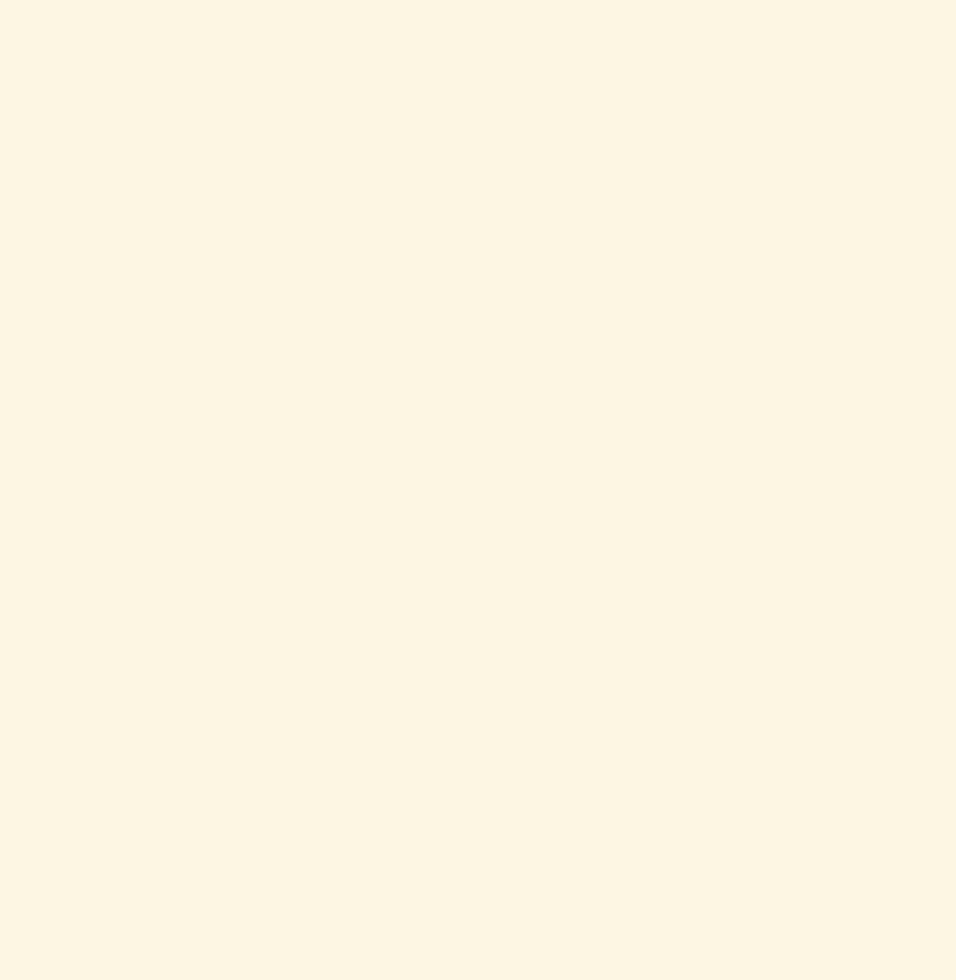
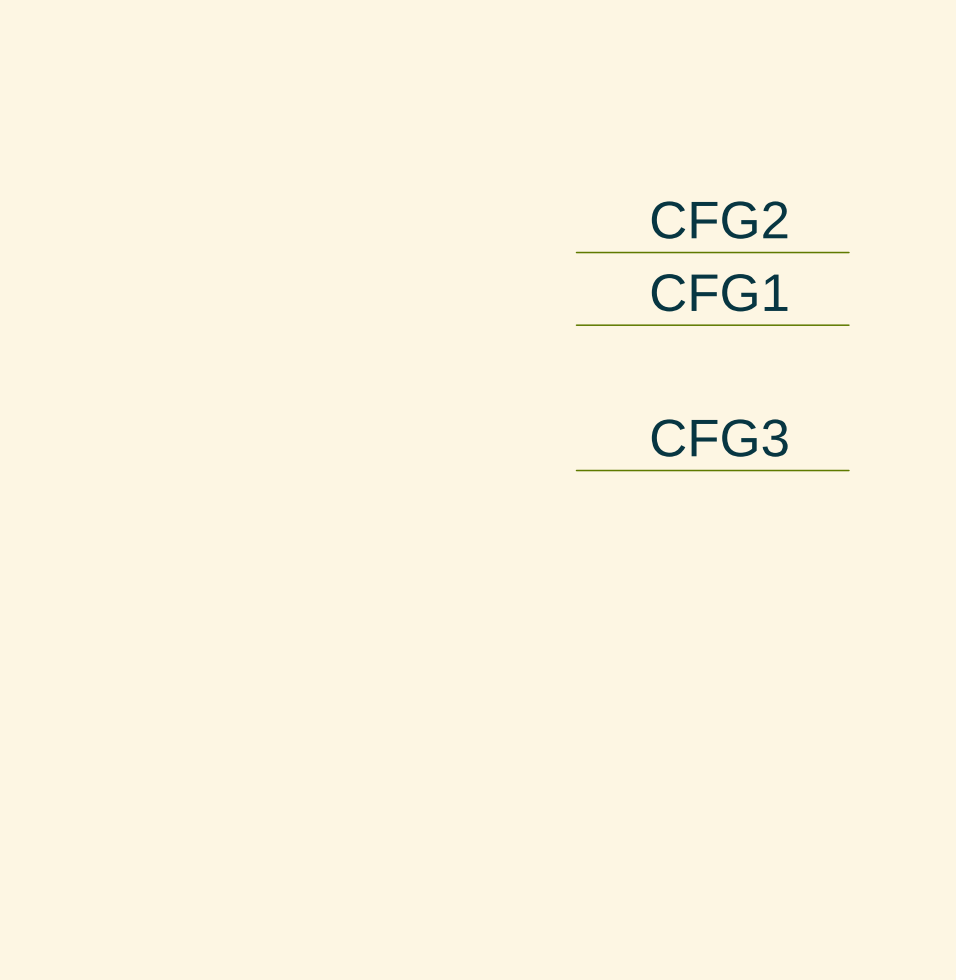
label: none -> CFG2 (719, 220)
wire: none -> (576, 252) (848, 252)
label: none -> CFG1 (719, 292)
wire: none -> (576, 325) (848, 325)
label: none -> CFG3 (719, 438)
wire: none -> (576, 470) (848, 470)

